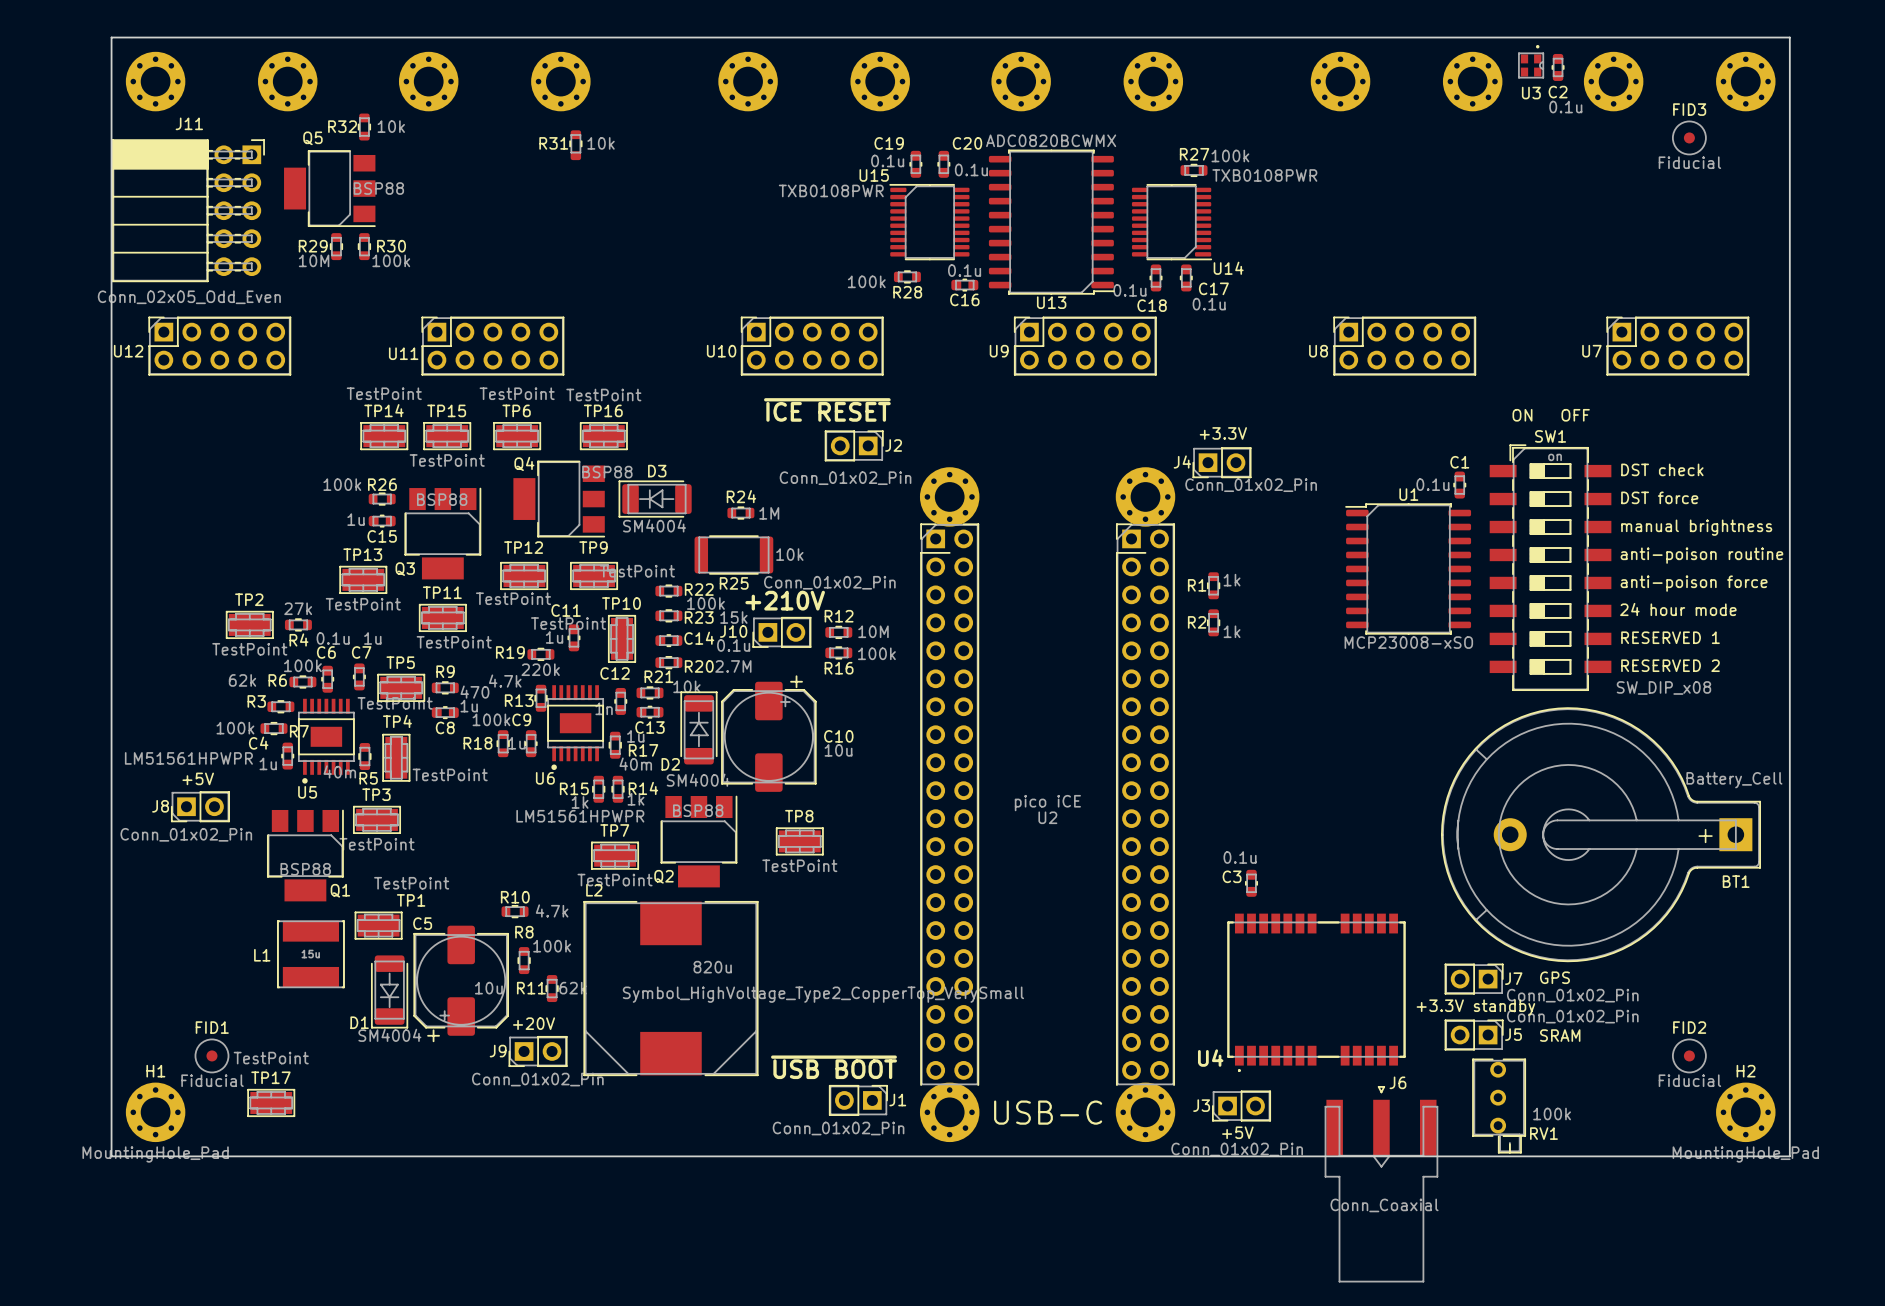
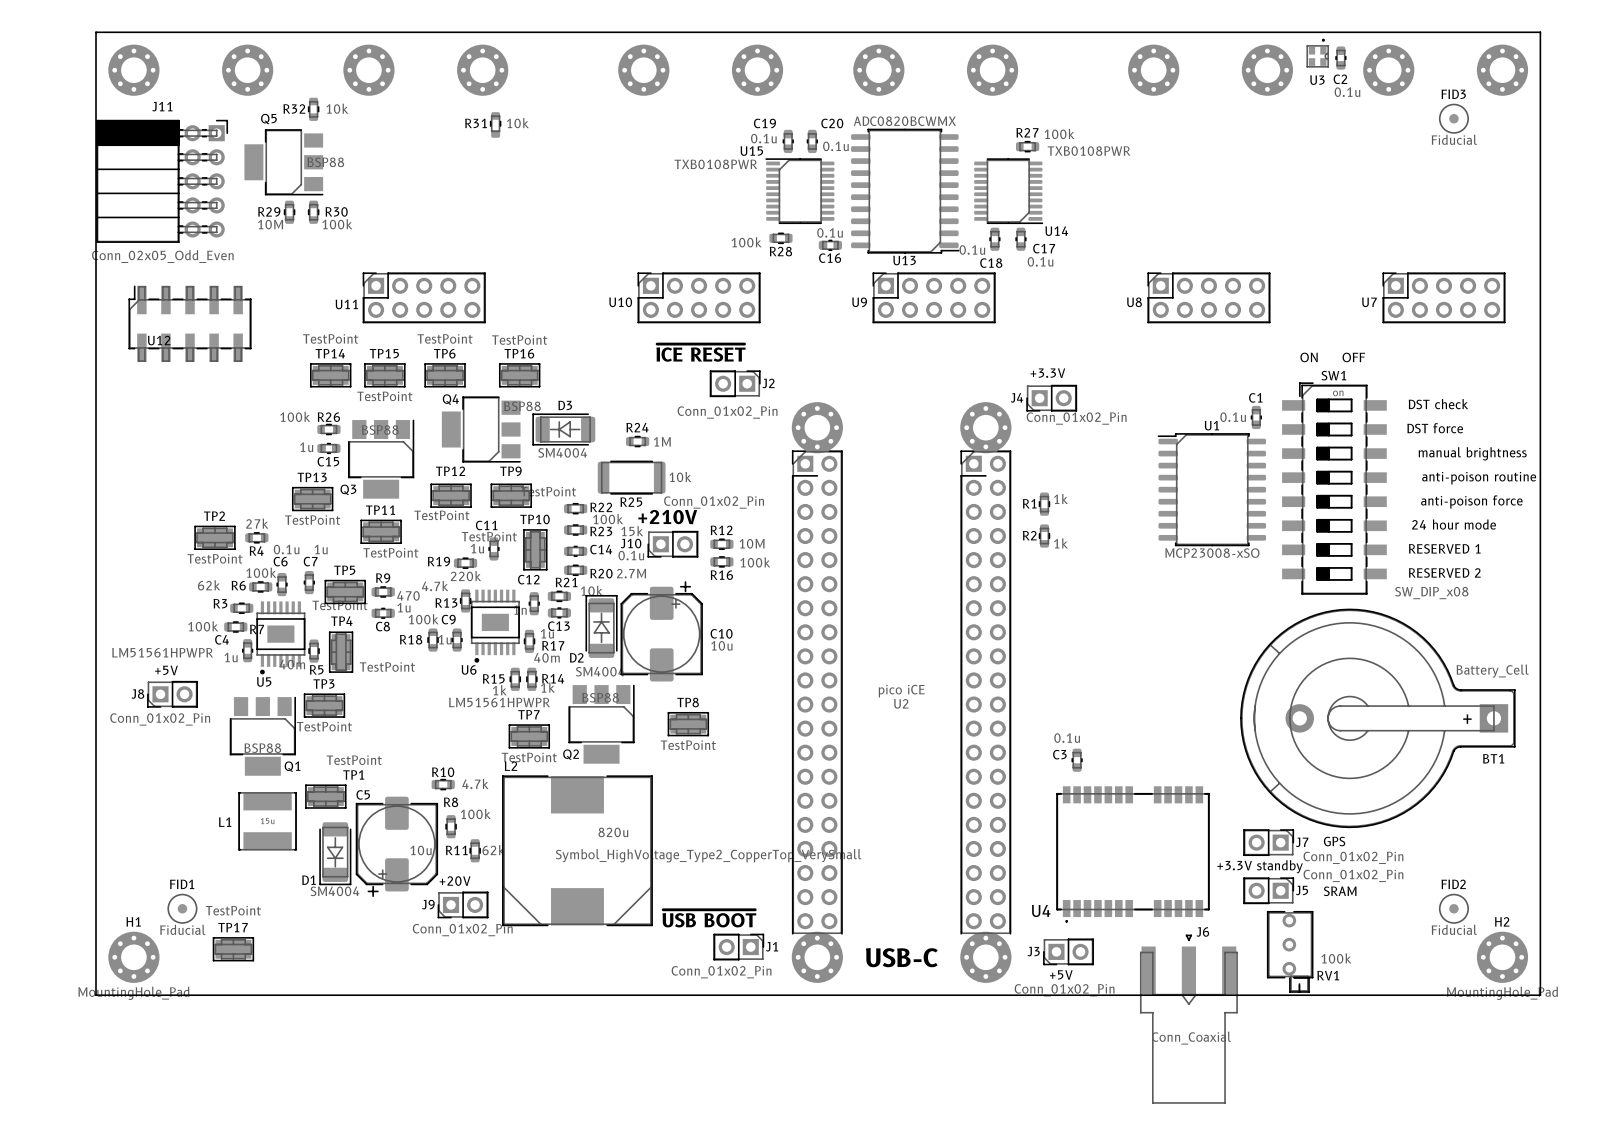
U12 footprint: [125, 51, 318, 376] -> [108, 44, 274, 363]
U12 name position: U12 (128, 351) -> U12 (159, 340)

